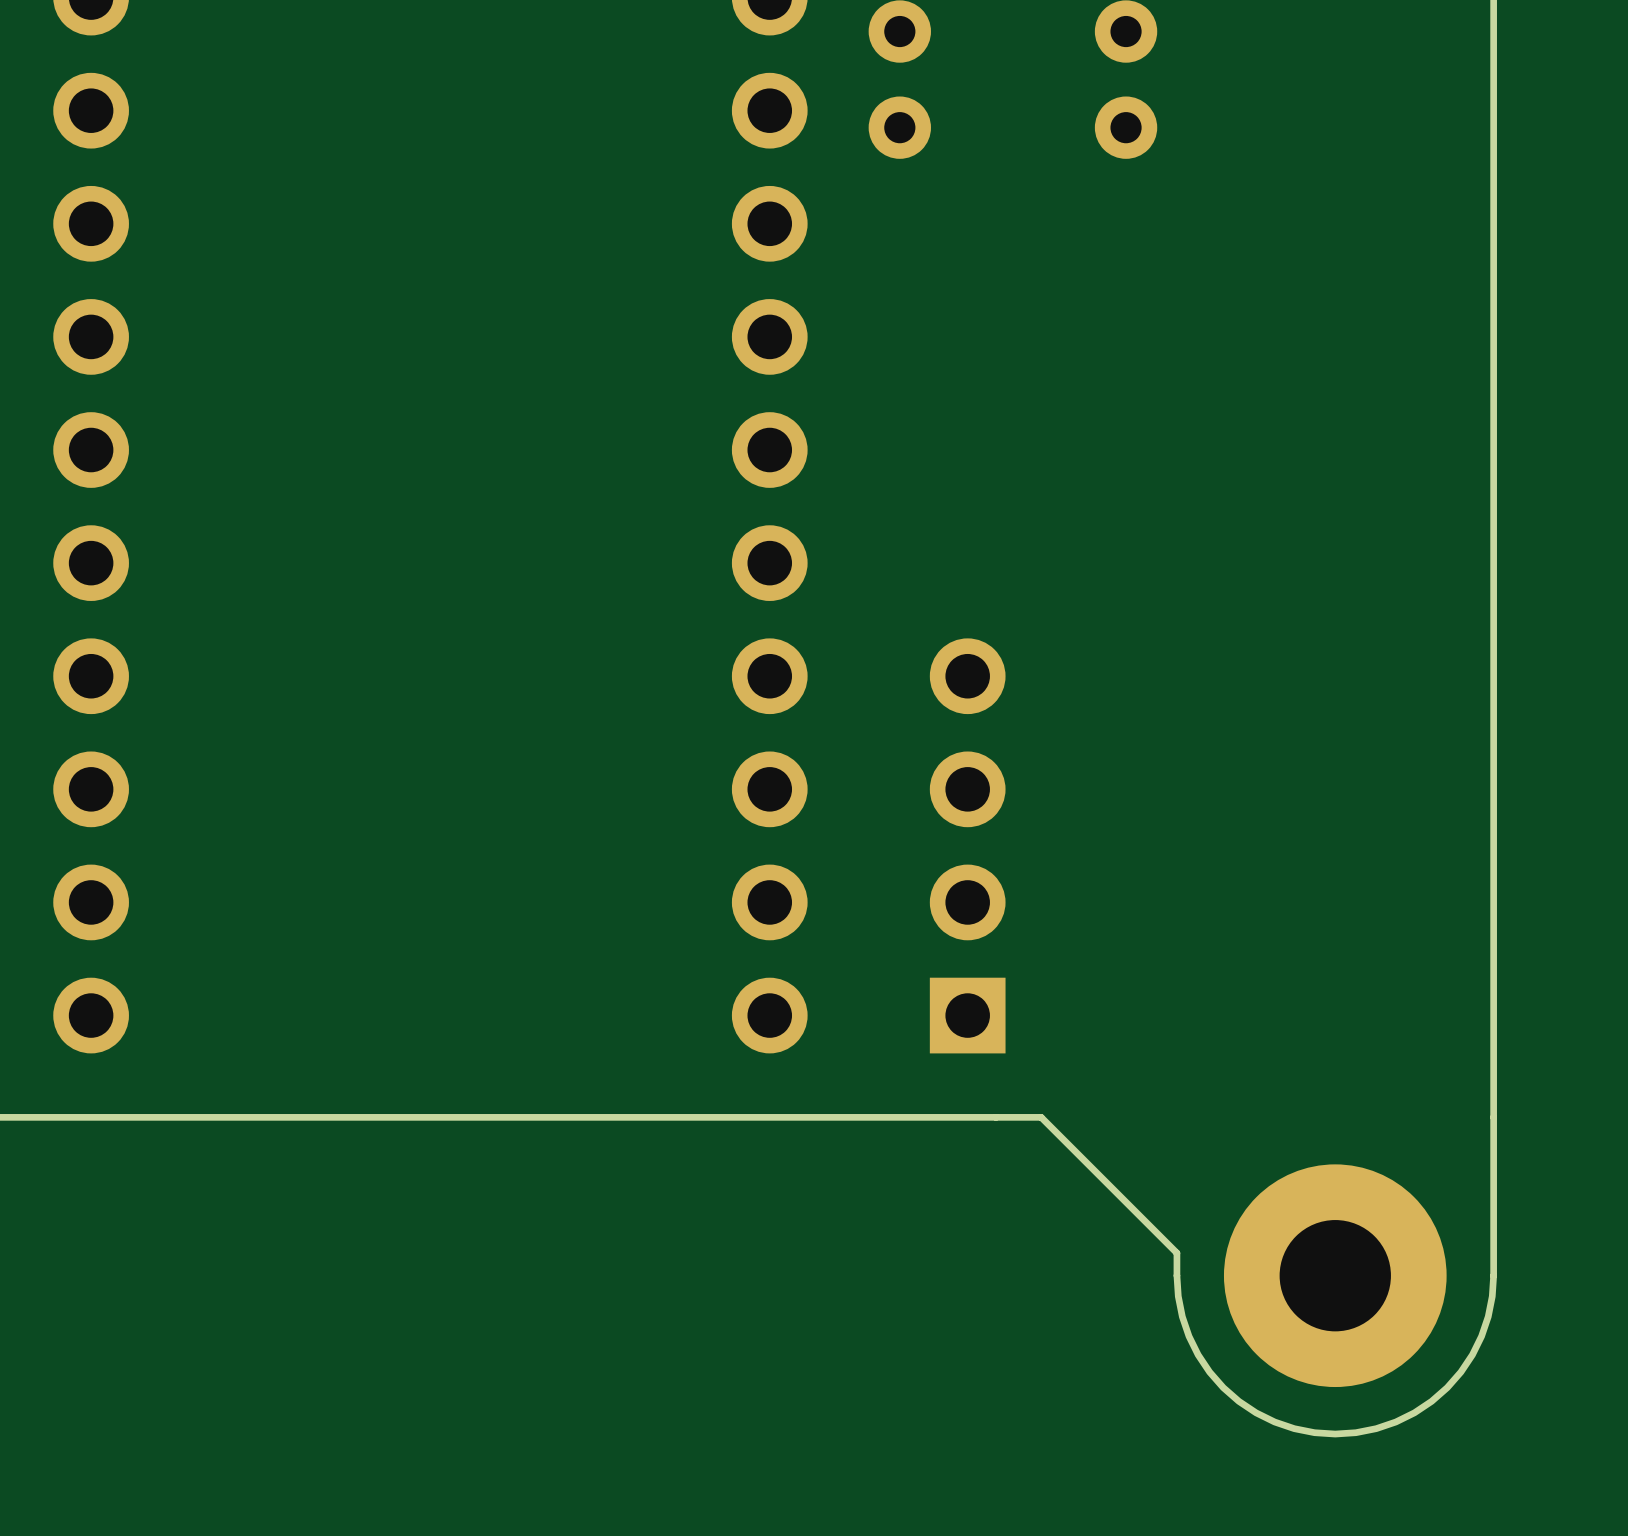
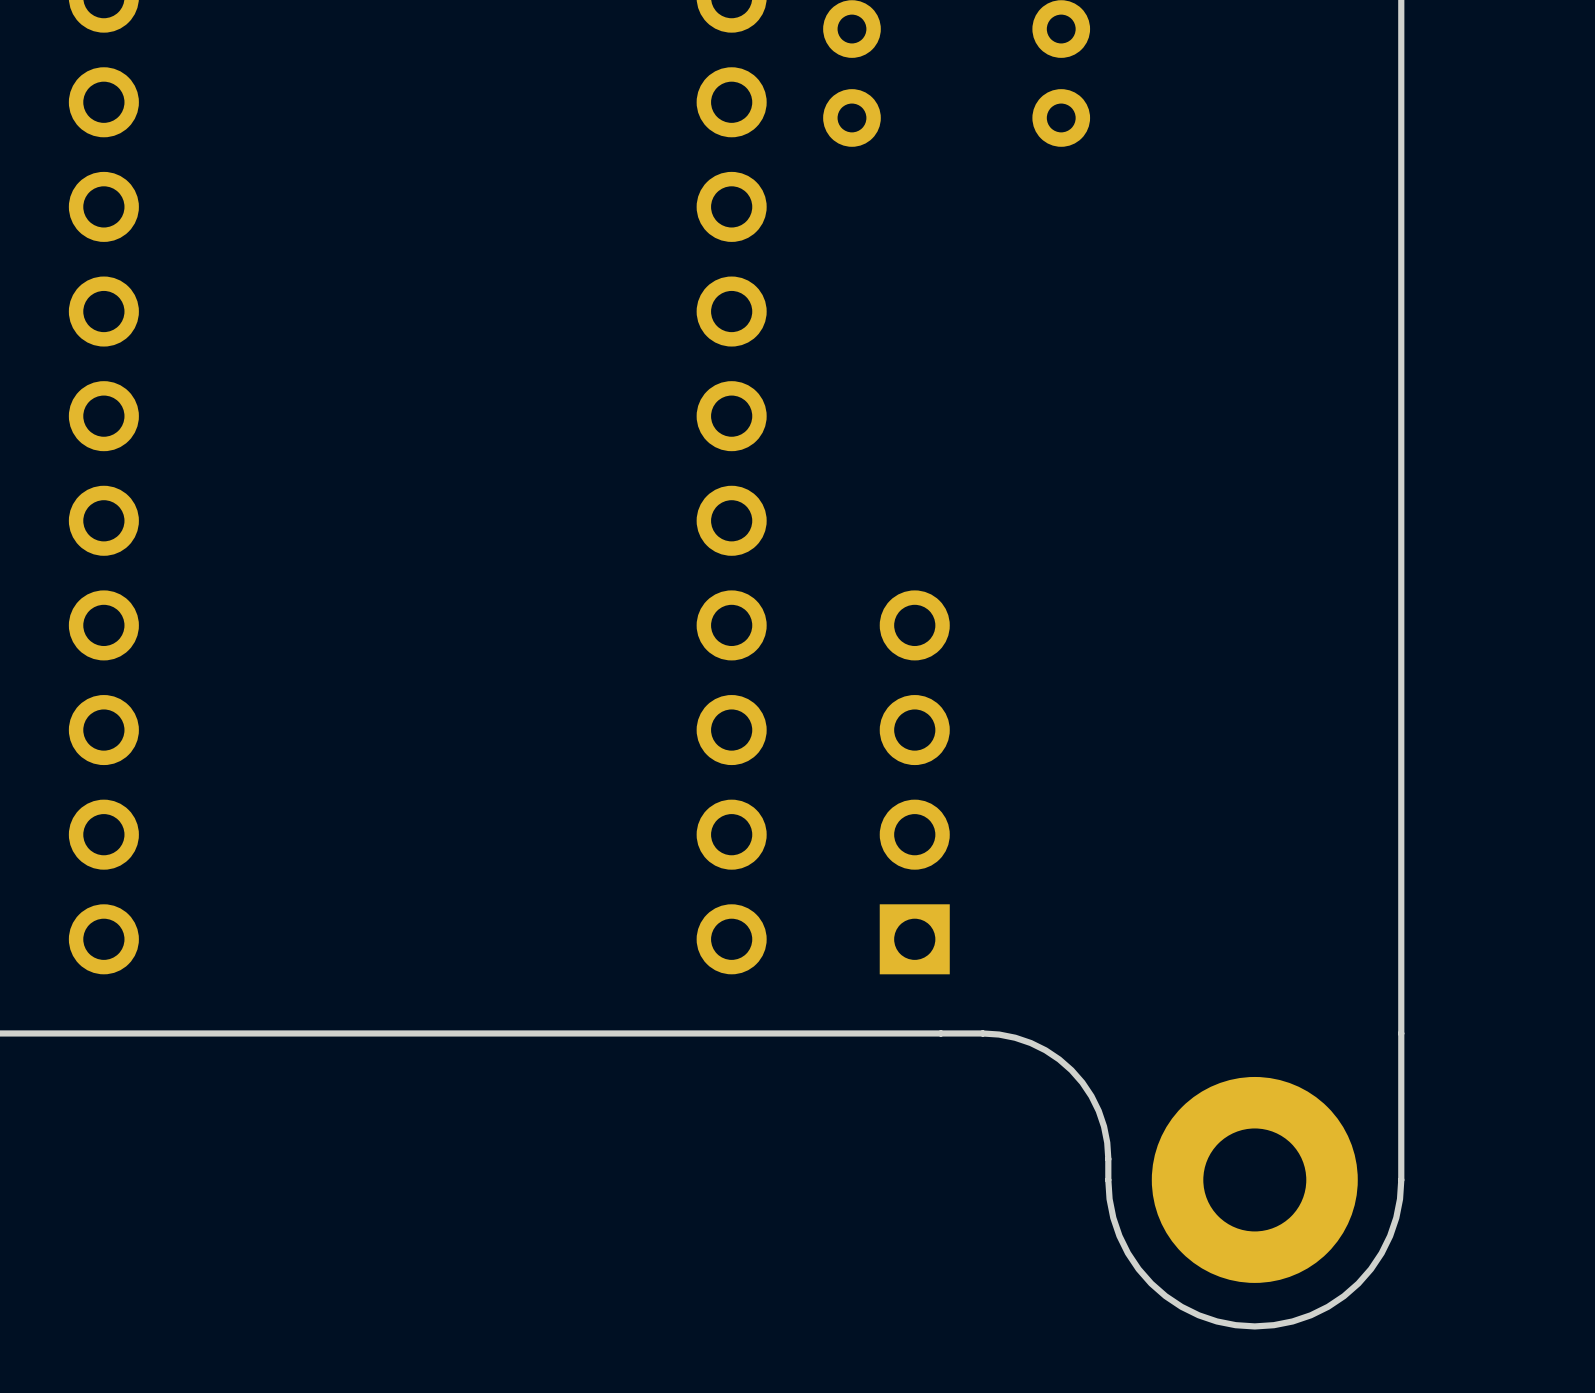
board edge: (1041, 1117) (1176, 1253) -> (982, 1033) (999, 1034) (1030, 1043) (1045, 1050) (1071, 1070) (1082, 1082) (1098, 1110) (1104, 1126) (1108, 1159)

